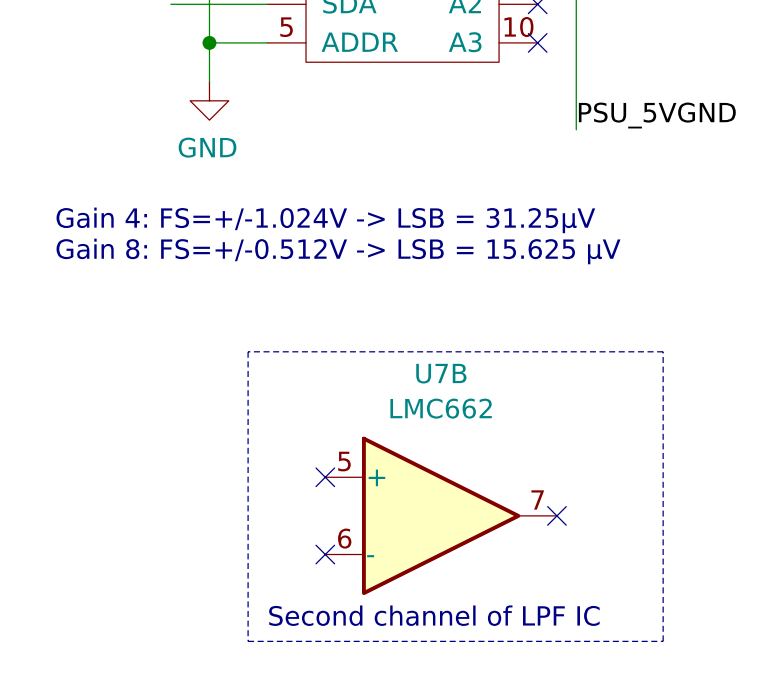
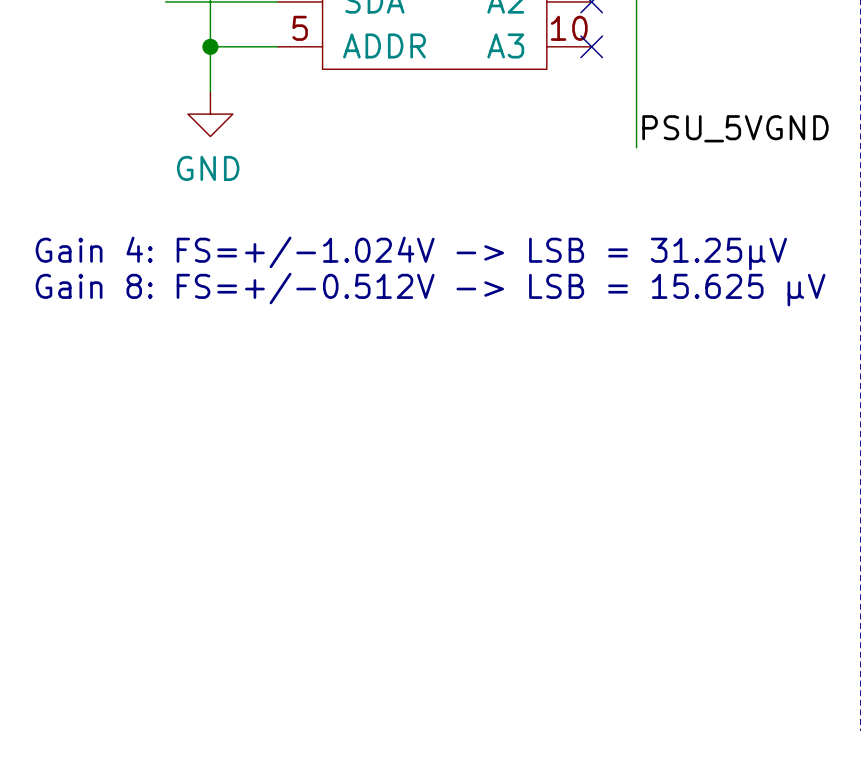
line: (248, 351) (663, 351) (663, 641) (248, 641) (248, 351) -> none
no-connect mark: (325, 477) -> none
U7B: LMC662 (441, 515) -> none
no-connect mark: (556, 515) -> none
no-connect mark: (325, 554) -> none
text: Second channel of LPF IC (434, 615) -> none

